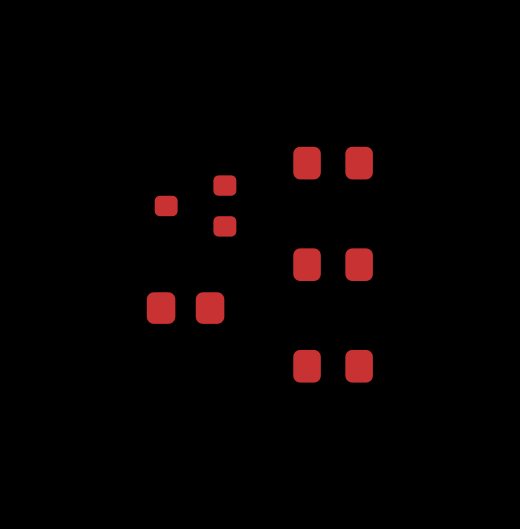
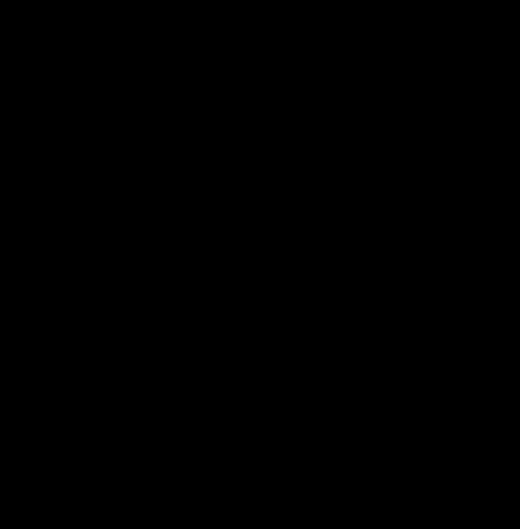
part: (333, 163) -> none
part: (195, 205) -> none
part: (333, 264) -> none
part: (185, 308) -> none
part: (333, 366) -> none

